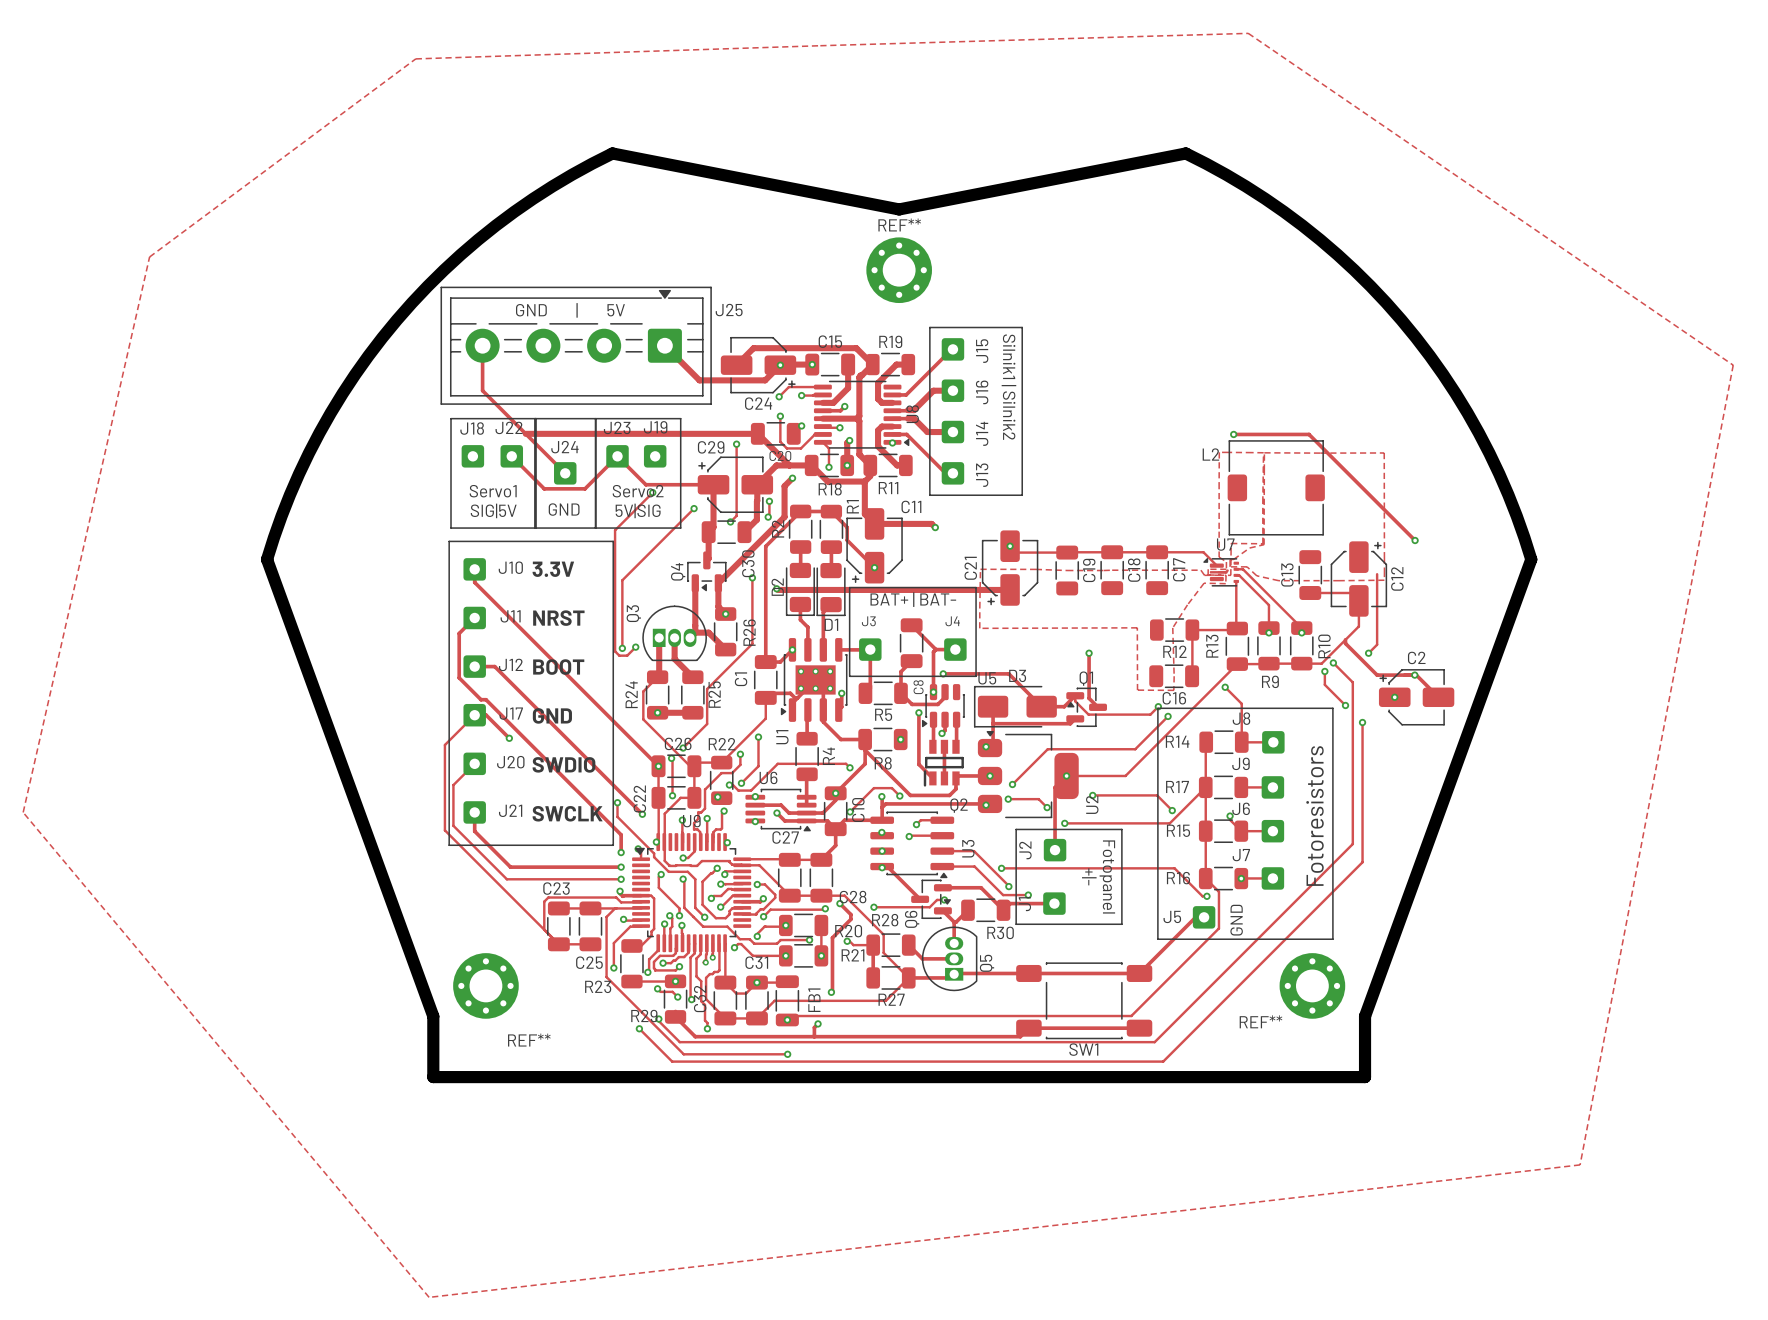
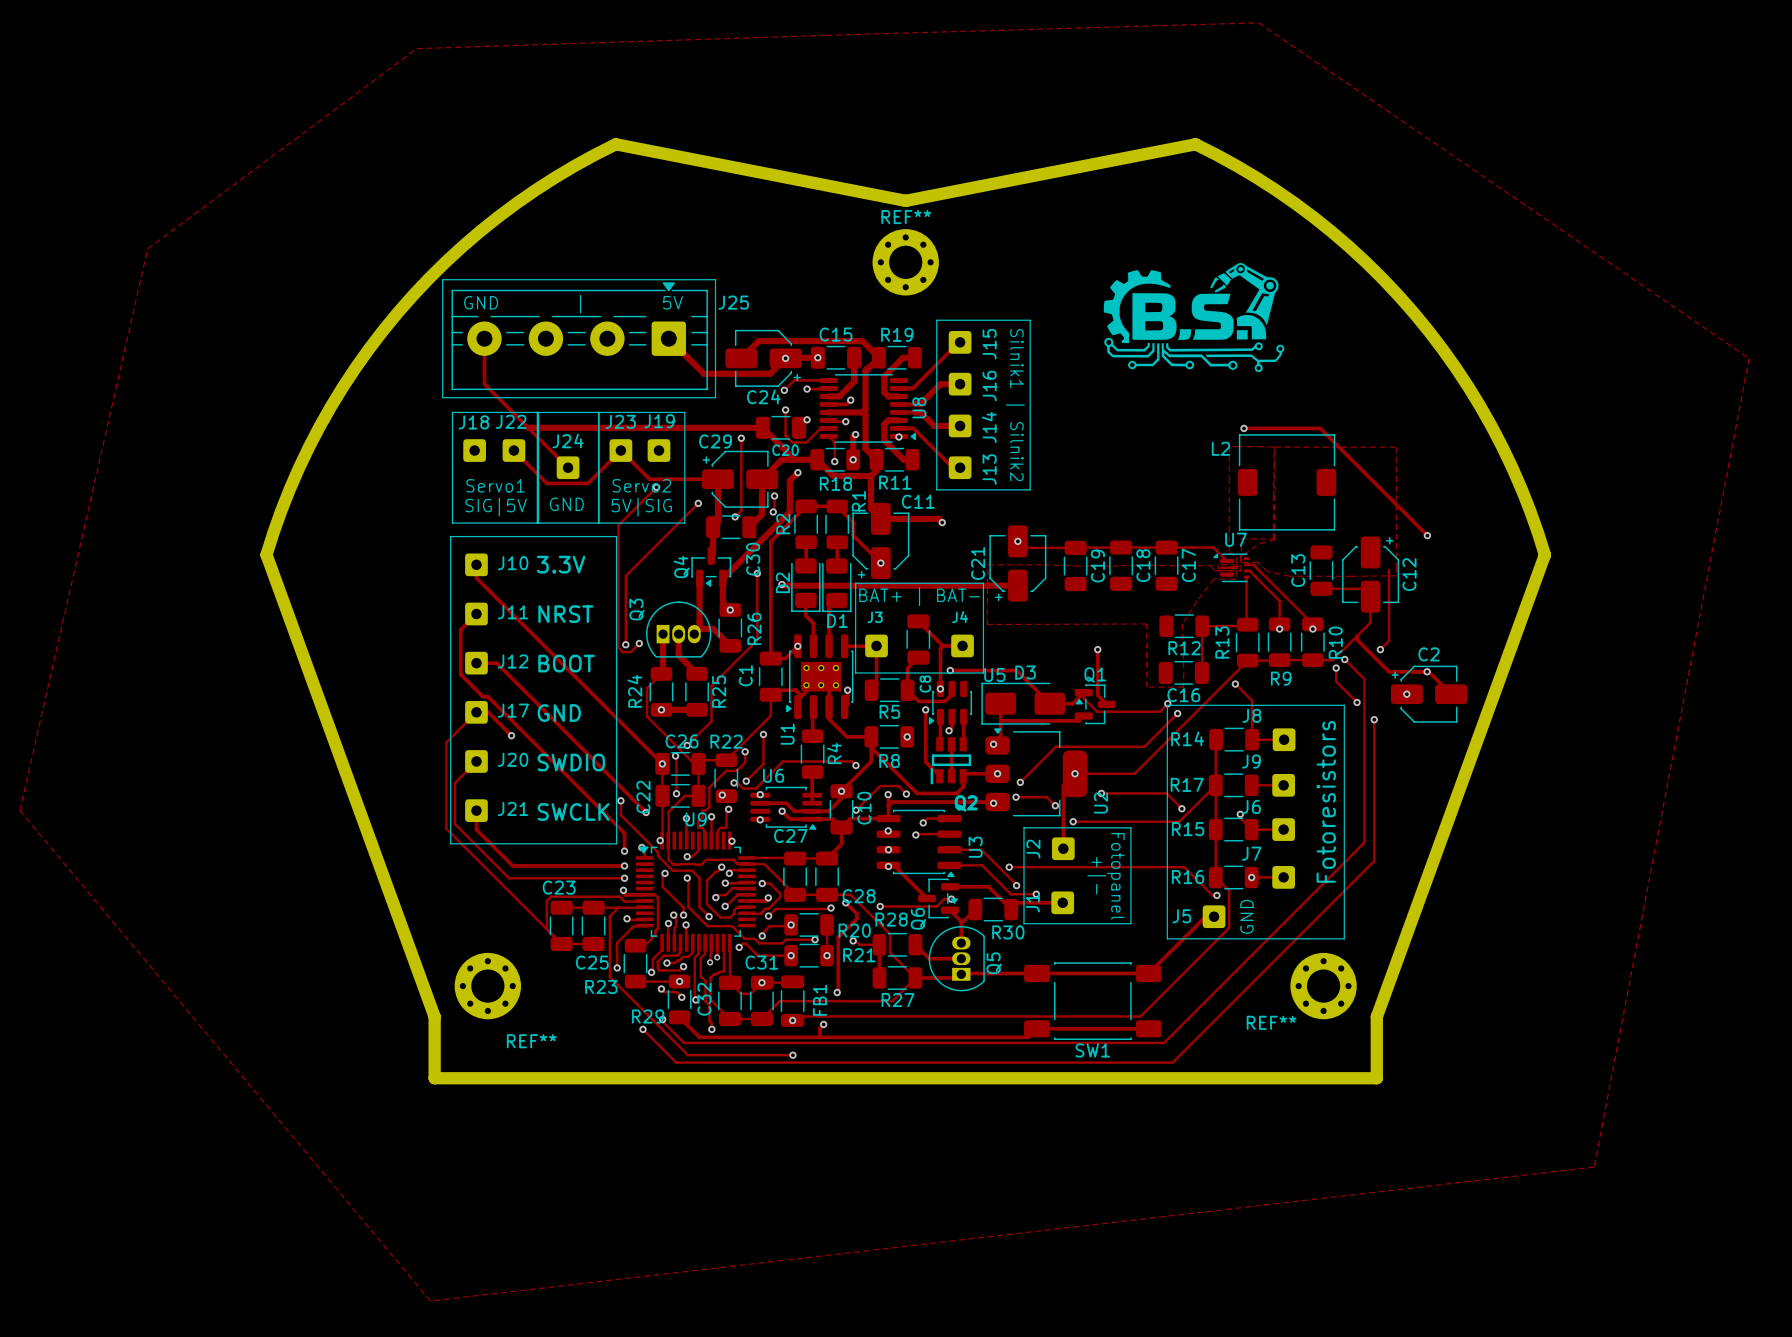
drawing: none -> [1103, 262, 1285, 373]

